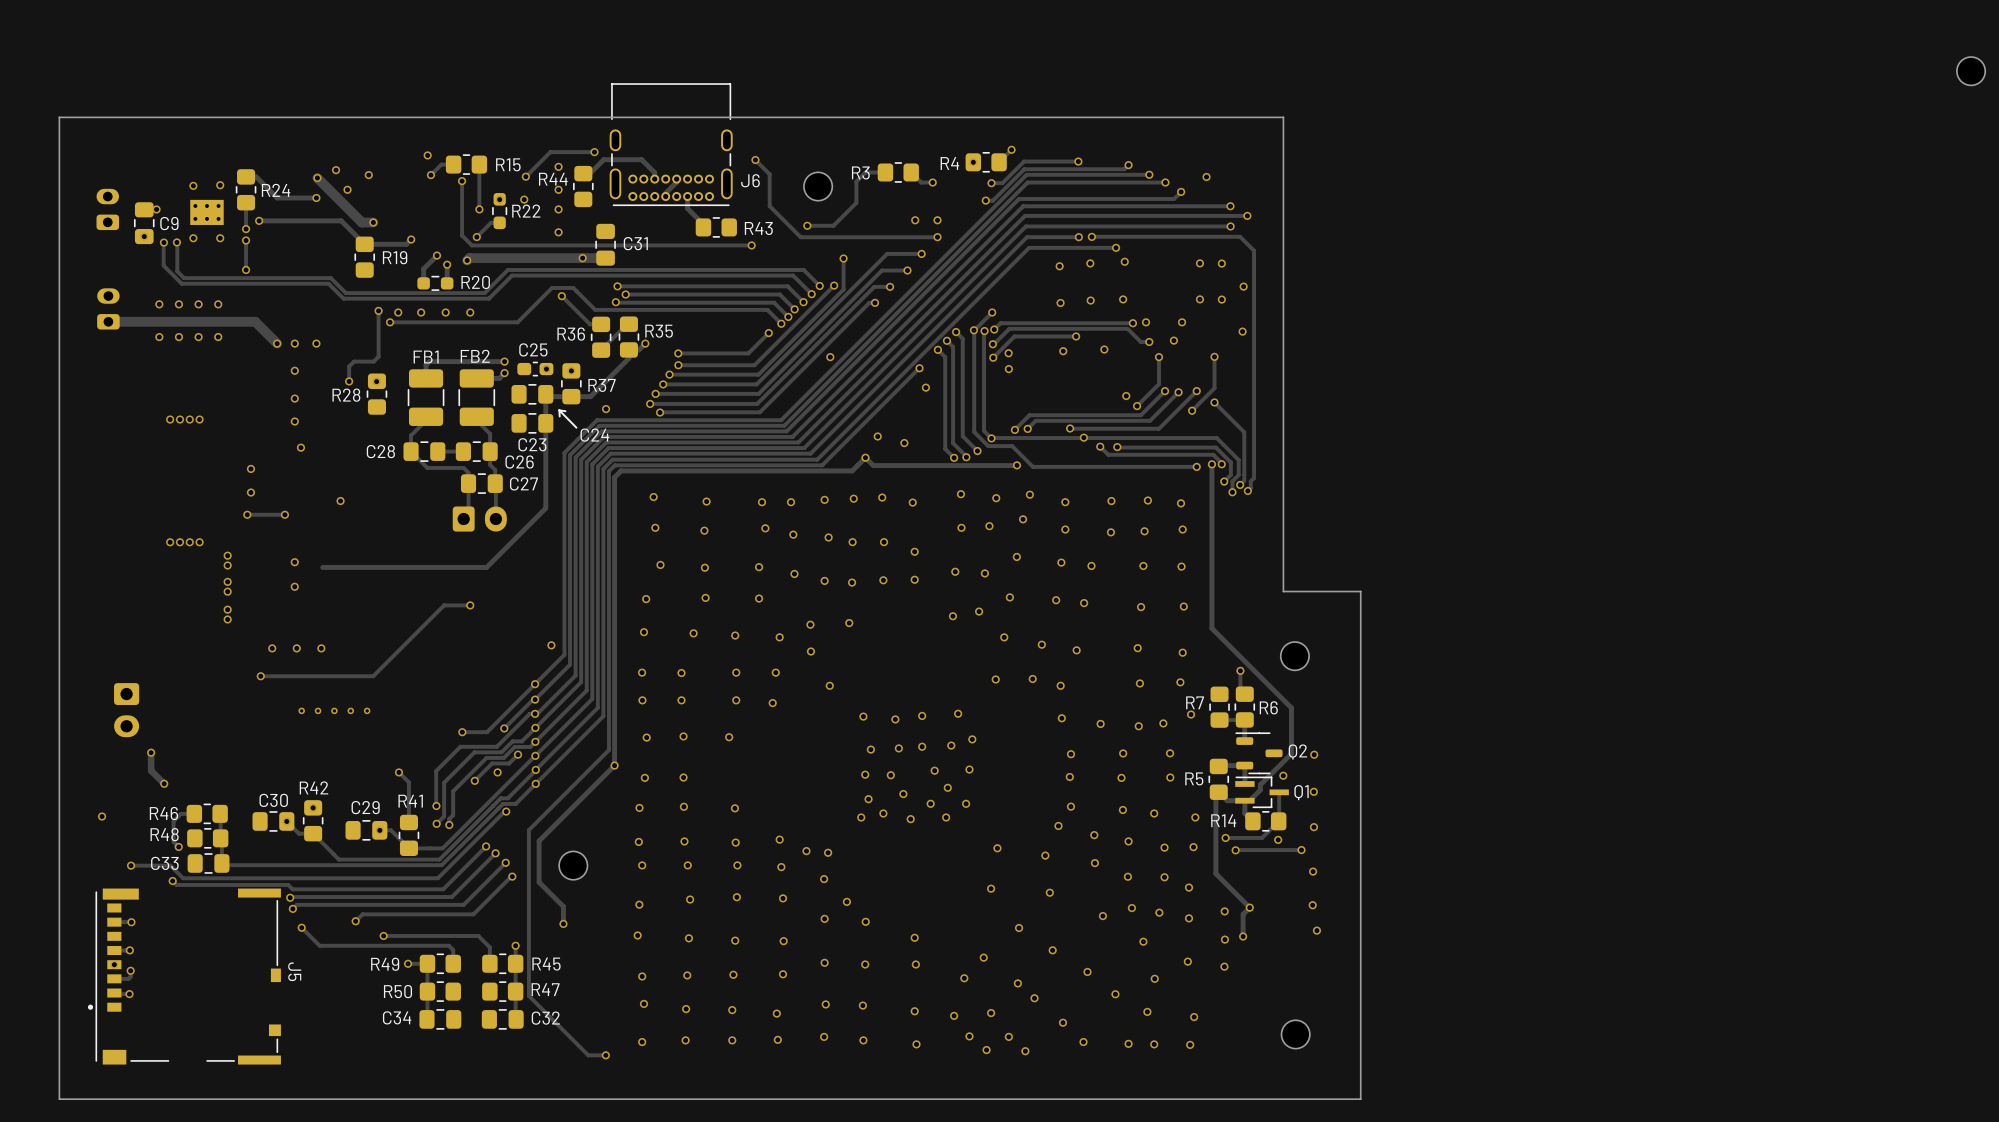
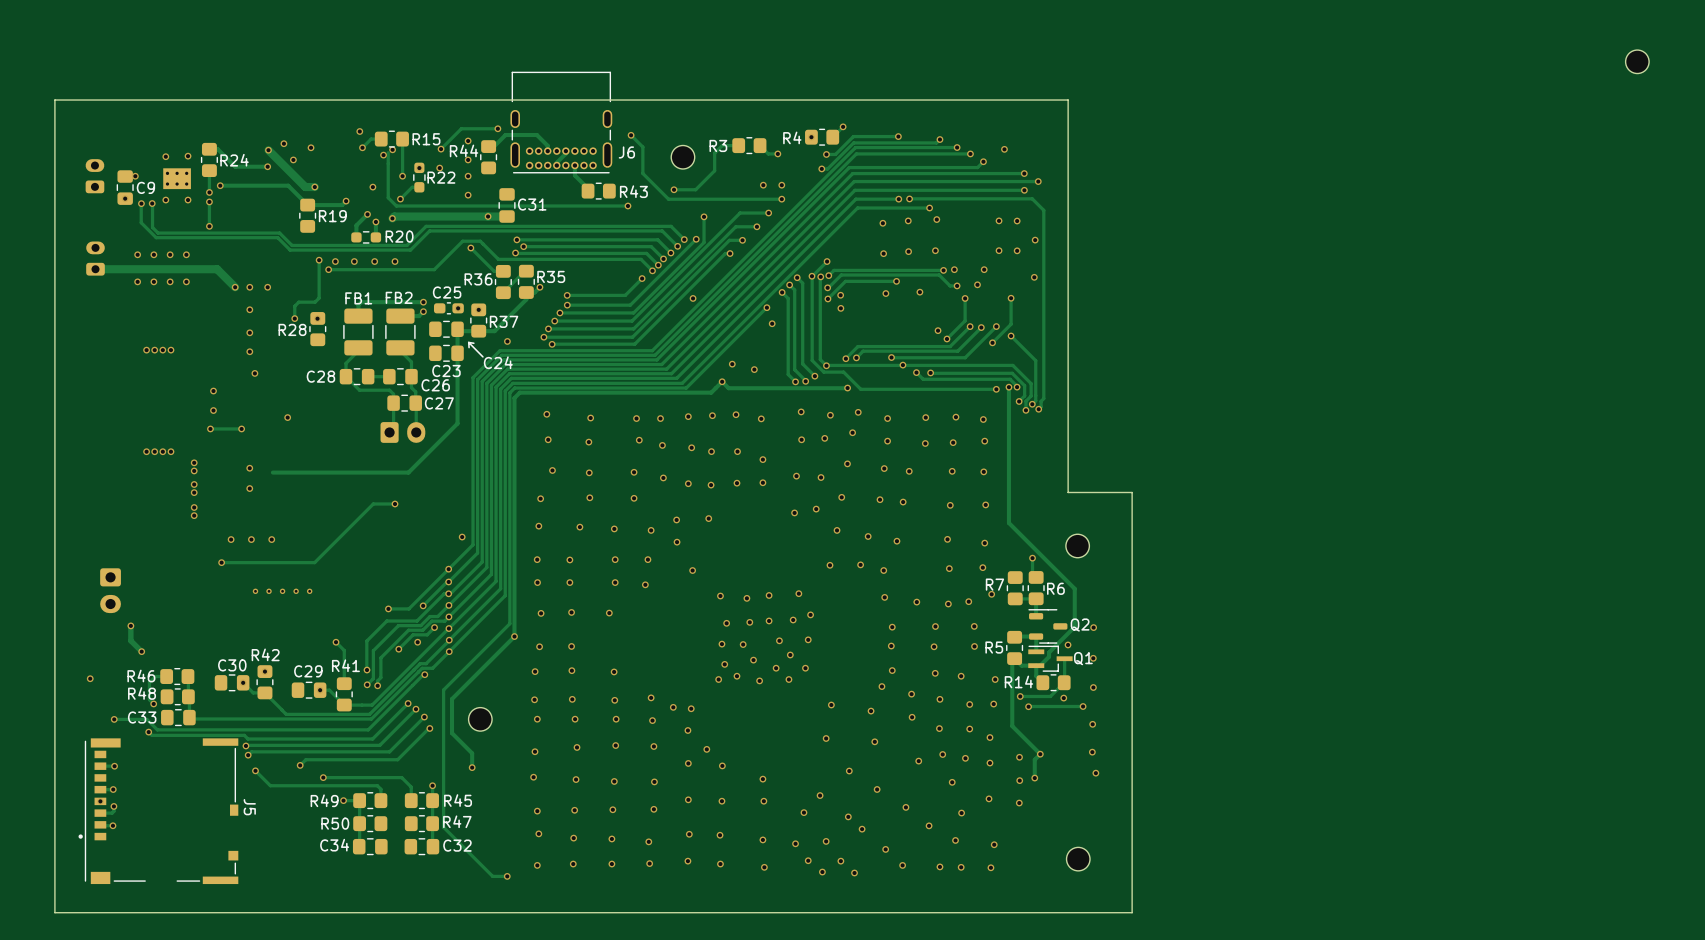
via: none -> (392, 149)
via: (462, 181) -> none
via: none -> (383, 155)
via: none -> (372, 187)

